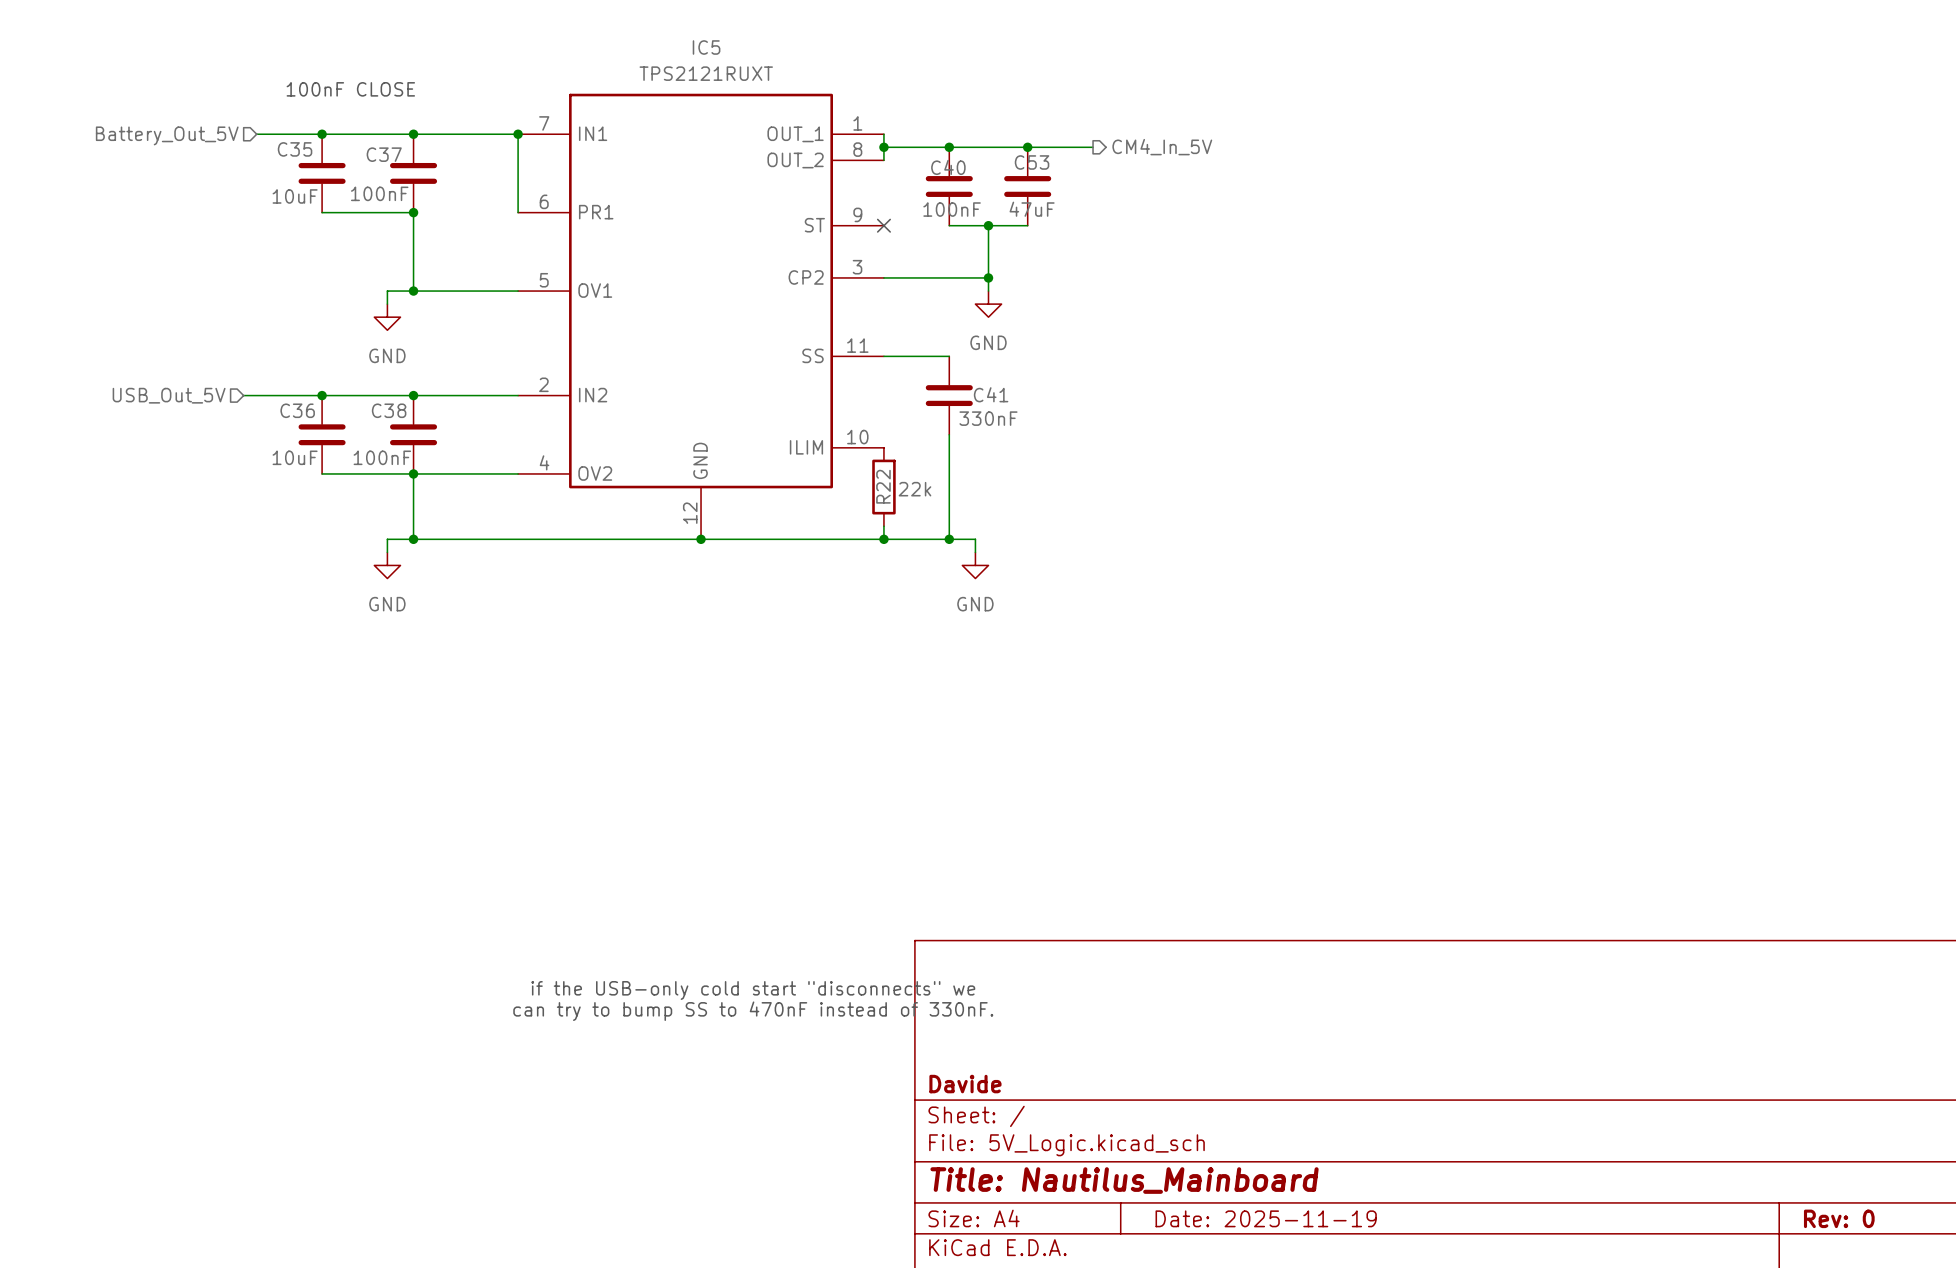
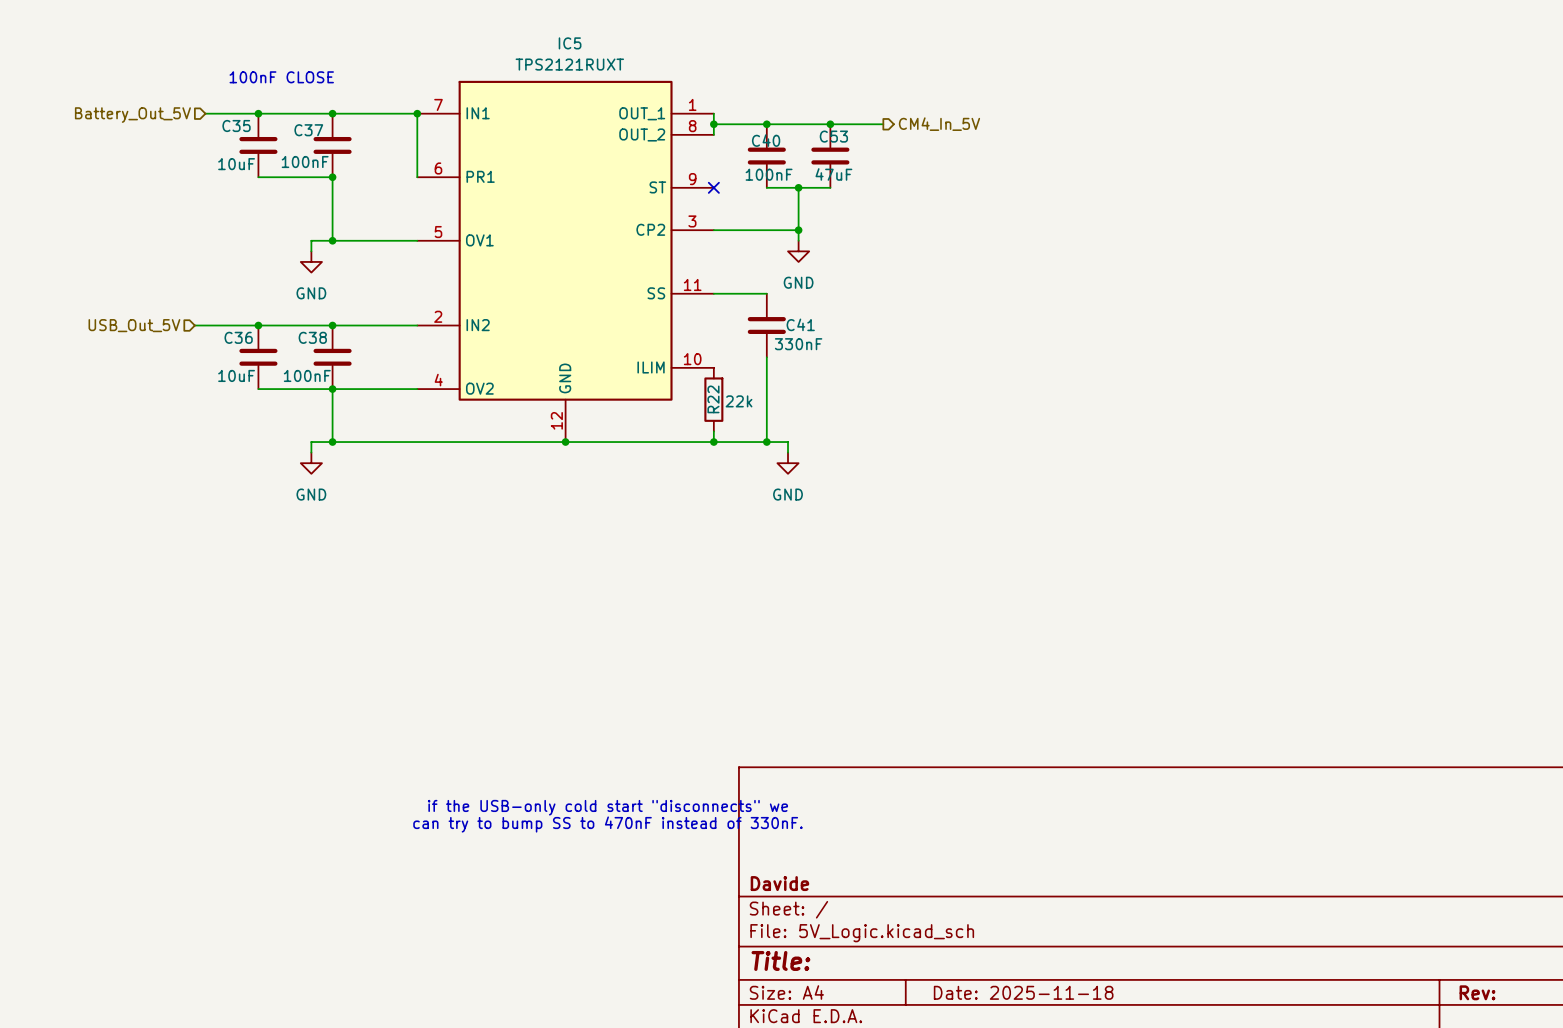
title block: Title: Nautilus_Mainboard (1124, 1180) -> Title: (780, 960)
title block: Date: 2025-11-19 (1266, 1218) -> Date: 2025-11-18 (1023, 992)
title block: Rev: 0 (1839, 1218) -> Rev: (1477, 992)

